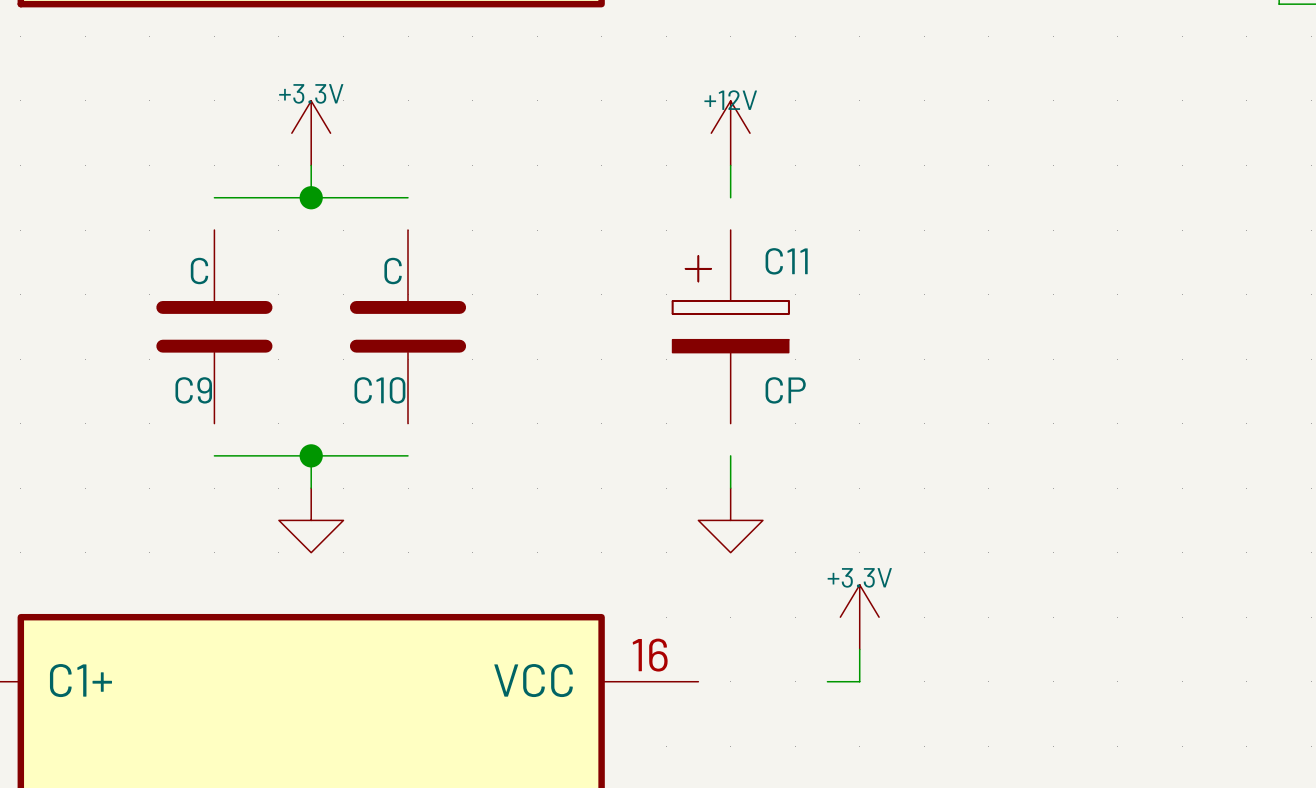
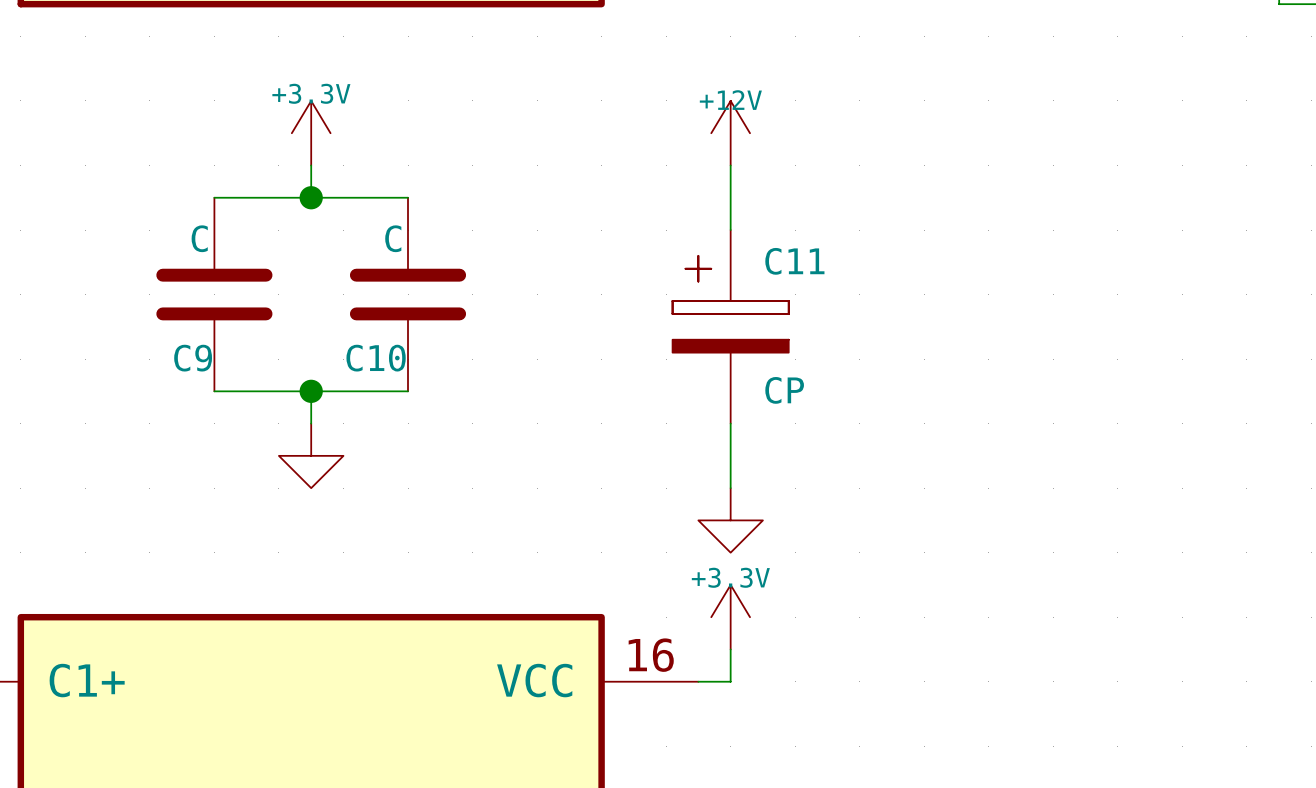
wire: none -> (730, 197) (730, 230)
C9 position: (214, 326) -> (214, 294)
C10 position: (408, 326) -> (408, 294)
wire: none -> (730, 423) (730, 455)
wire: (214, 455) (408, 455) -> (214, 391) (408, 391)
wire: (311, 455) (311, 488) -> (311, 391) (311, 423)
junction position: (311, 455) -> (311, 391)
power symbol position: (311, 520) -> (311, 455)
power symbol position: +3.3V (859, 617) -> +3.3V (730, 617)
wire: (859, 649) (859, 681) (827, 681) -> (730, 649) (730, 681) (698, 681)

